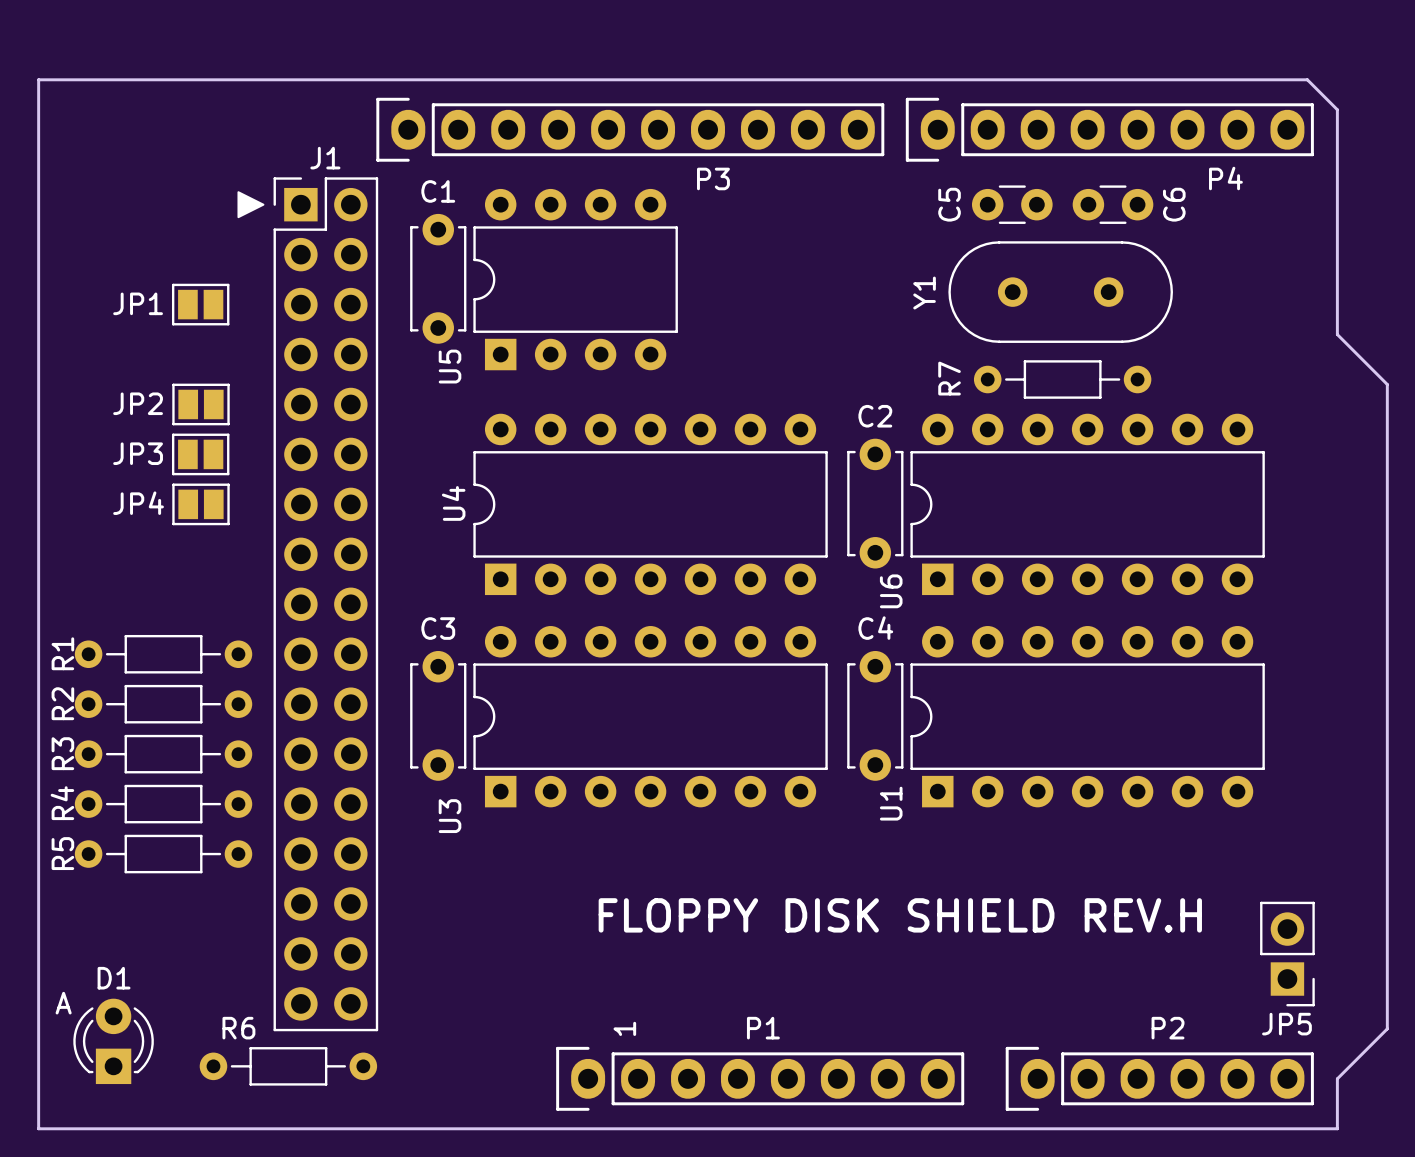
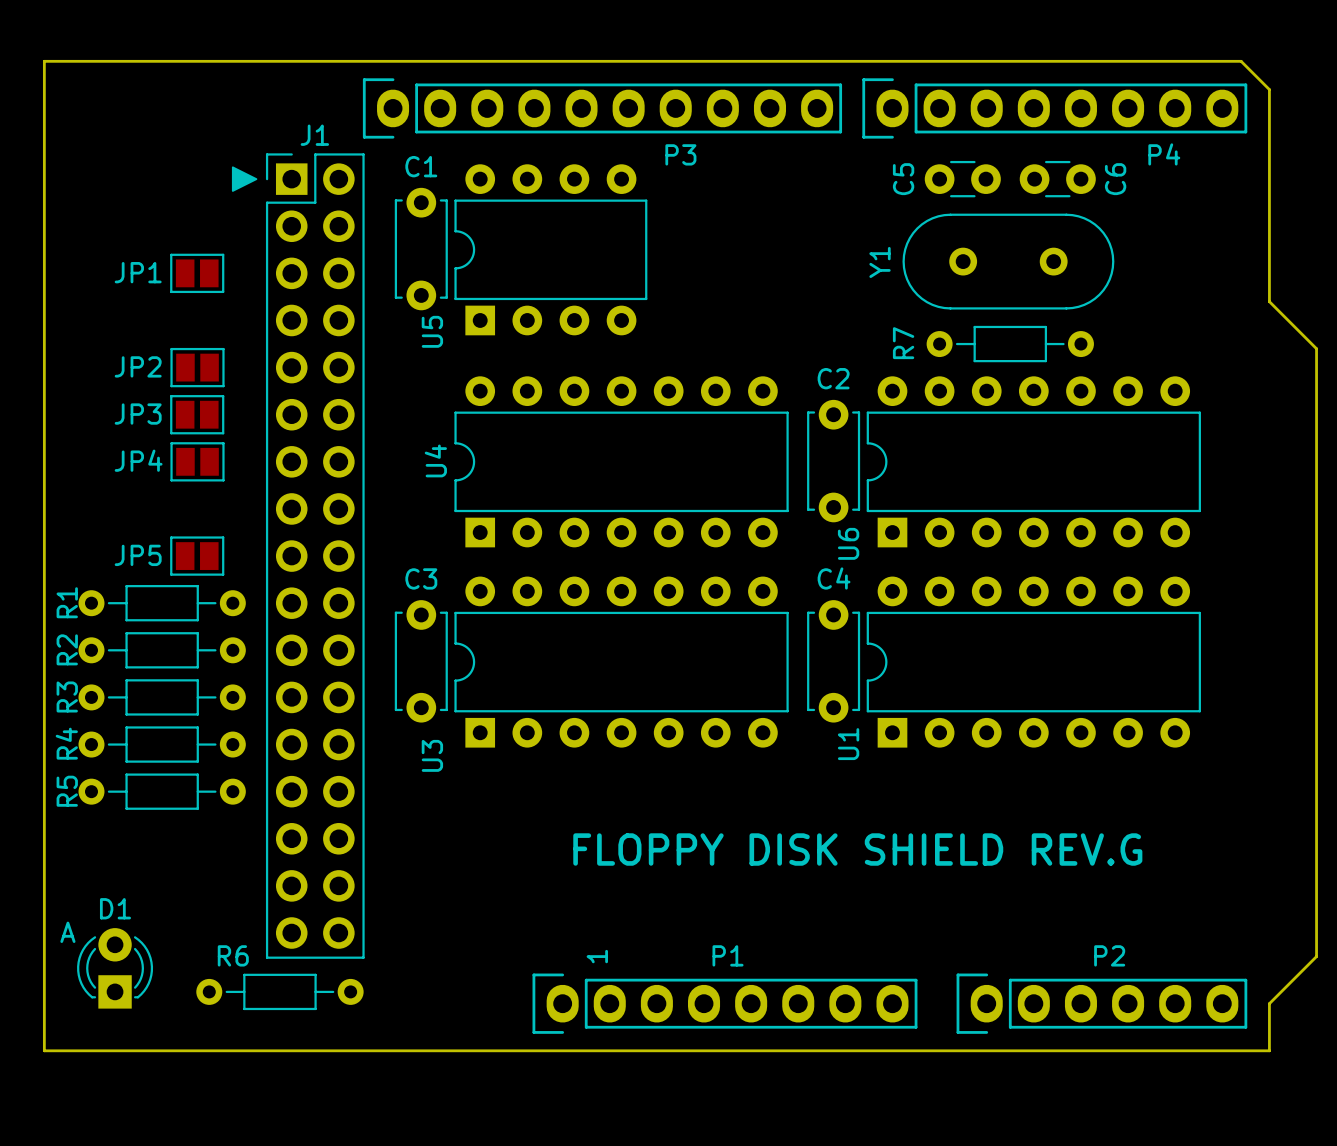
JP5 footprint: [1260, 901, 1315, 1007] -> [170, 536, 225, 576]
text: FLOPPY DISK SHIELD REV.H (900, 915) -> FLOPPY DISK SHIELD REV.G (857, 849)
JP5 name position: JP5 (1286, 1024) -> JP5 (138, 555)

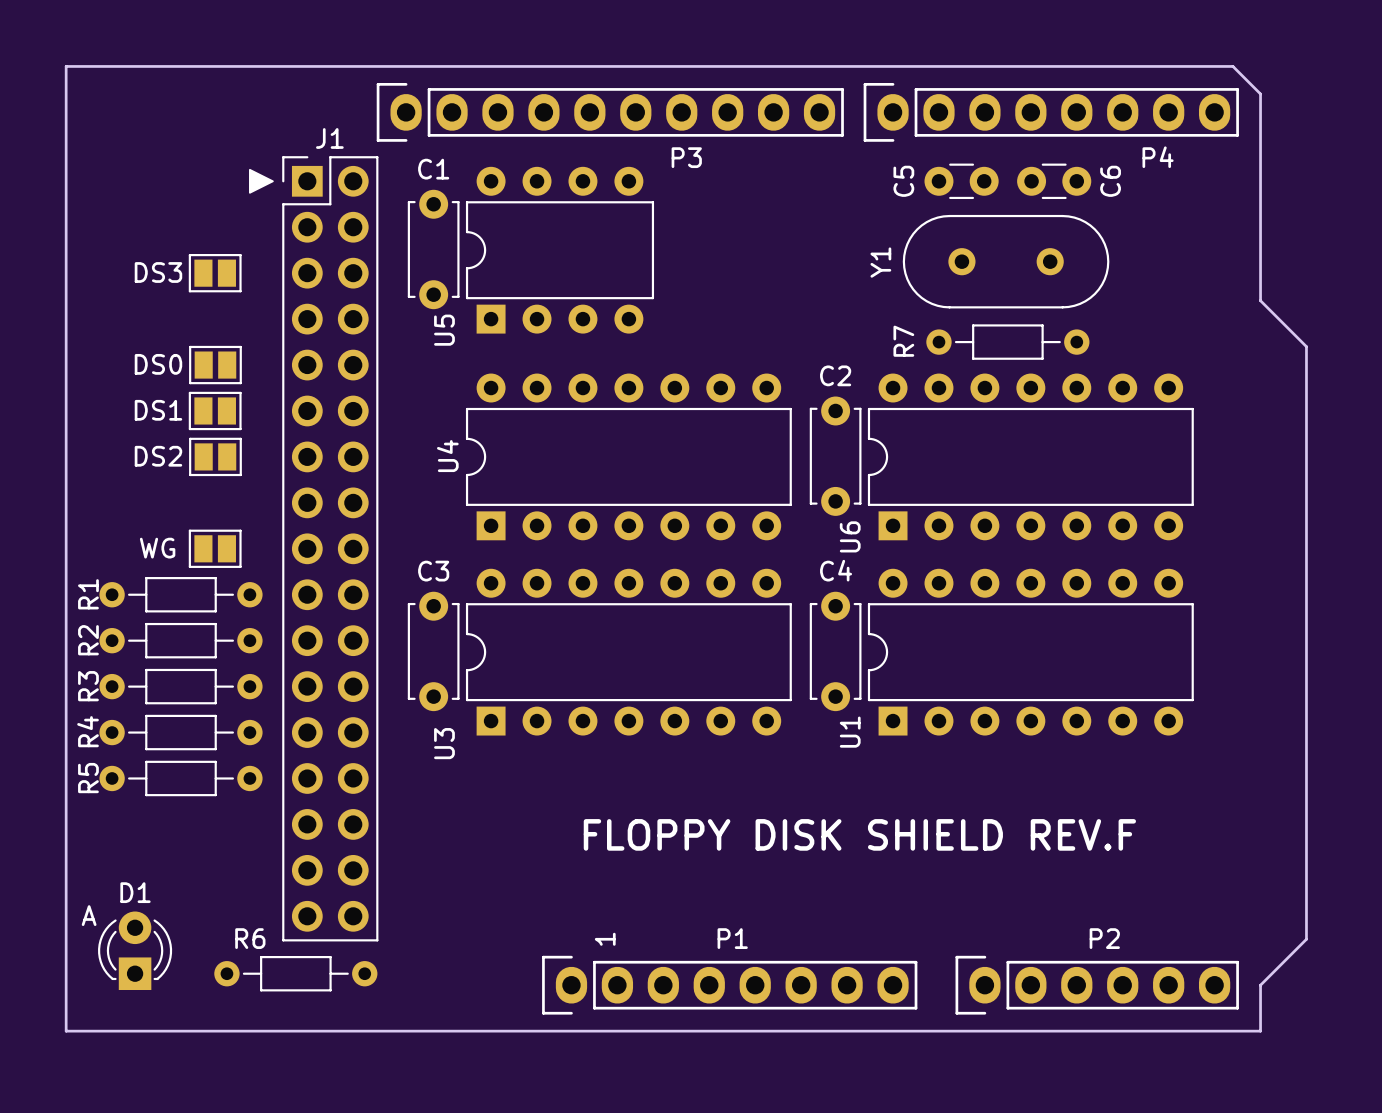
JP1 name: JP1 (138, 272) -> DS3 (158, 272)
JP2 name: JP2 (138, 366) -> DS0 (158, 364)
JP3 name: JP3 (138, 414) -> DS1 (158, 410)
JP4 name: JP4 (138, 460) -> DS2 (158, 456)
JP5 name: JP5 (138, 555) -> WG (157, 548)
text: FLOPPY DISK SHIELD REV.G (857, 849) -> FLOPPY DISK SHIELD REV.F (859, 834)

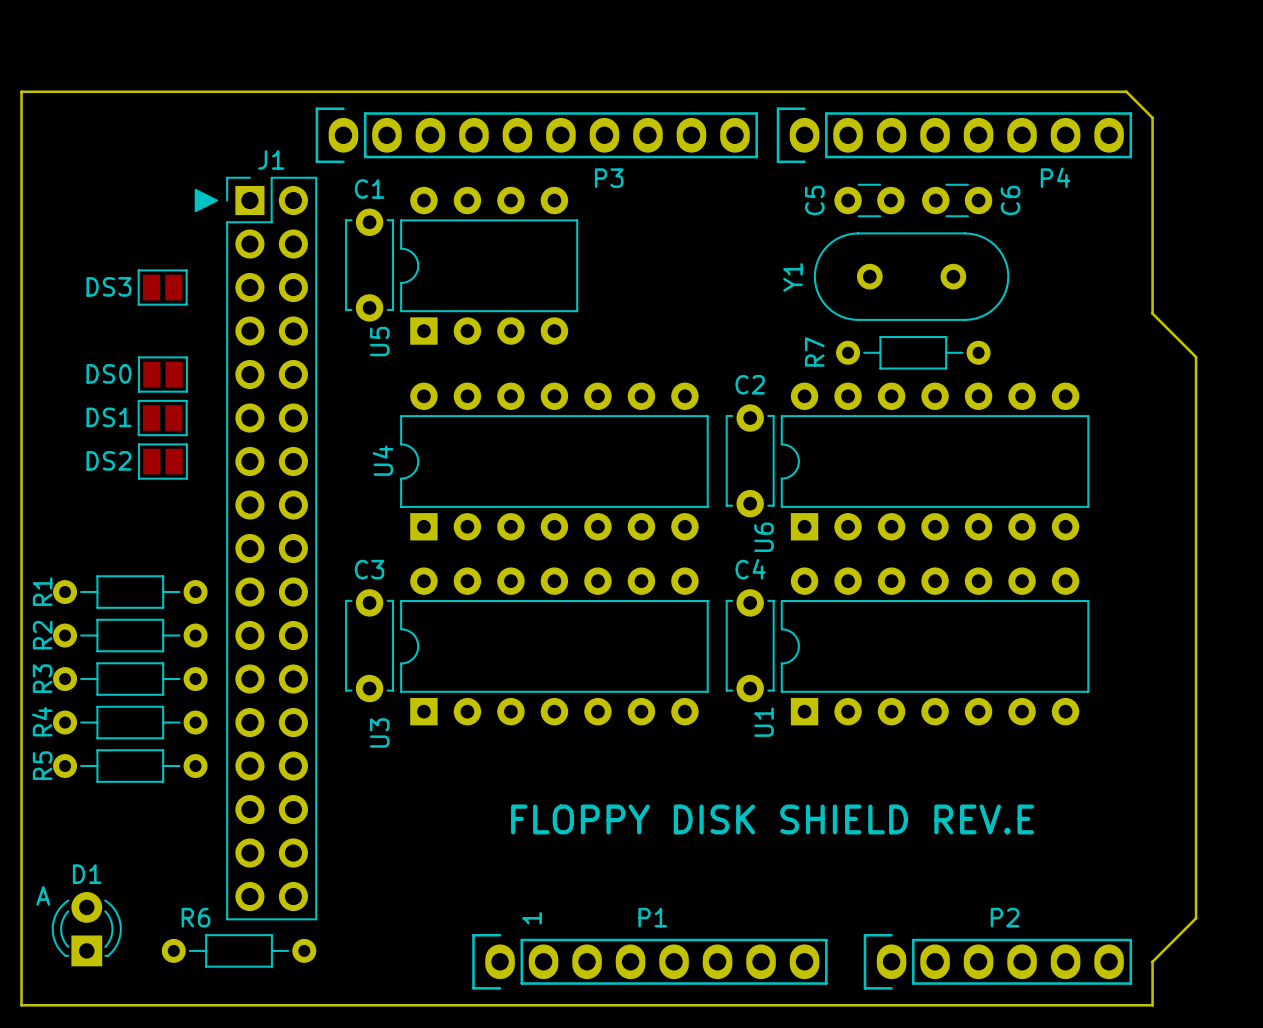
WG: (215, 548) -> none
text: FLOPPY DISK SHIELD REV.F (859, 834) -> FLOPPY DISK SHIELD REV.E (772, 819)

